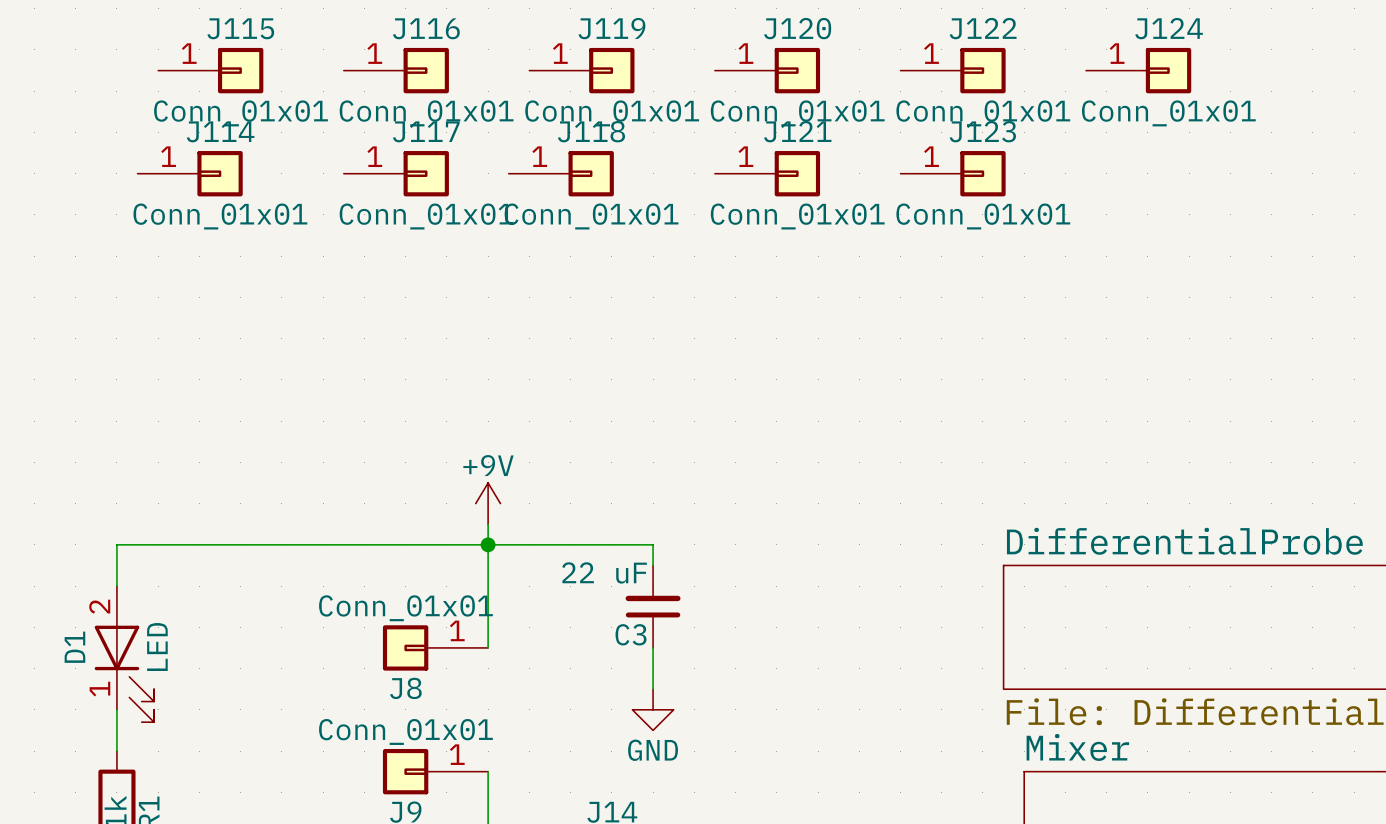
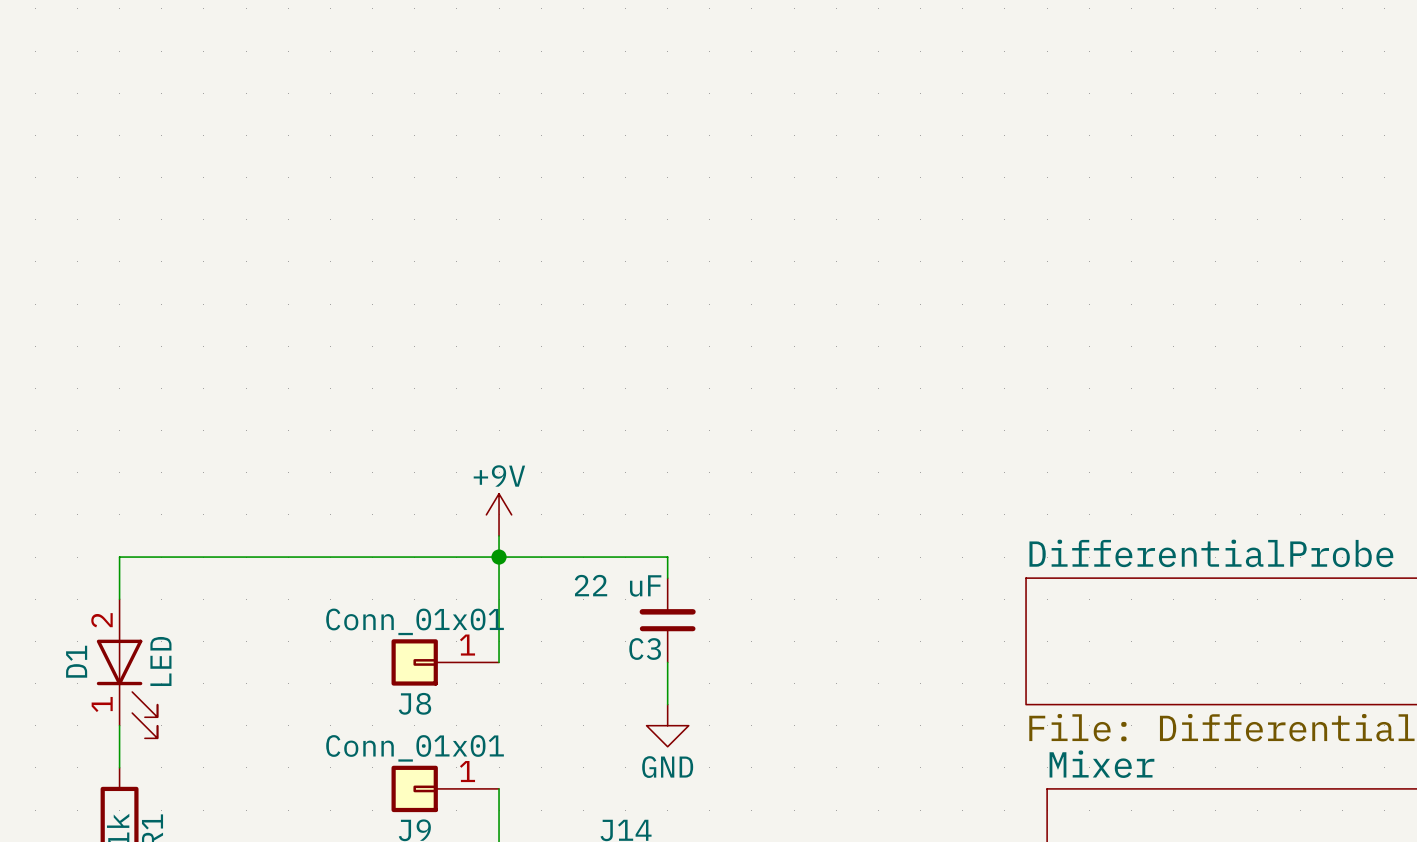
J115: Conn_01x01 (210, 70) -> none
J116: Conn_01x01 (396, 70) -> none
J119: Conn_01x01 (581, 70) -> none
J120: Conn_01x01 (767, 70) -> none
J122: Conn_01x01 (953, 70) -> none
J124: Conn_01x01 (1138, 70) -> none
J114: Conn_01x01 (190, 173) -> none
J117: Conn_01x01 (396, 173) -> none
J118: Conn_01x01 (561, 173) -> none
J121: Conn_01x01 (767, 173) -> none
J123: Conn_01x01 (953, 173) -> none

